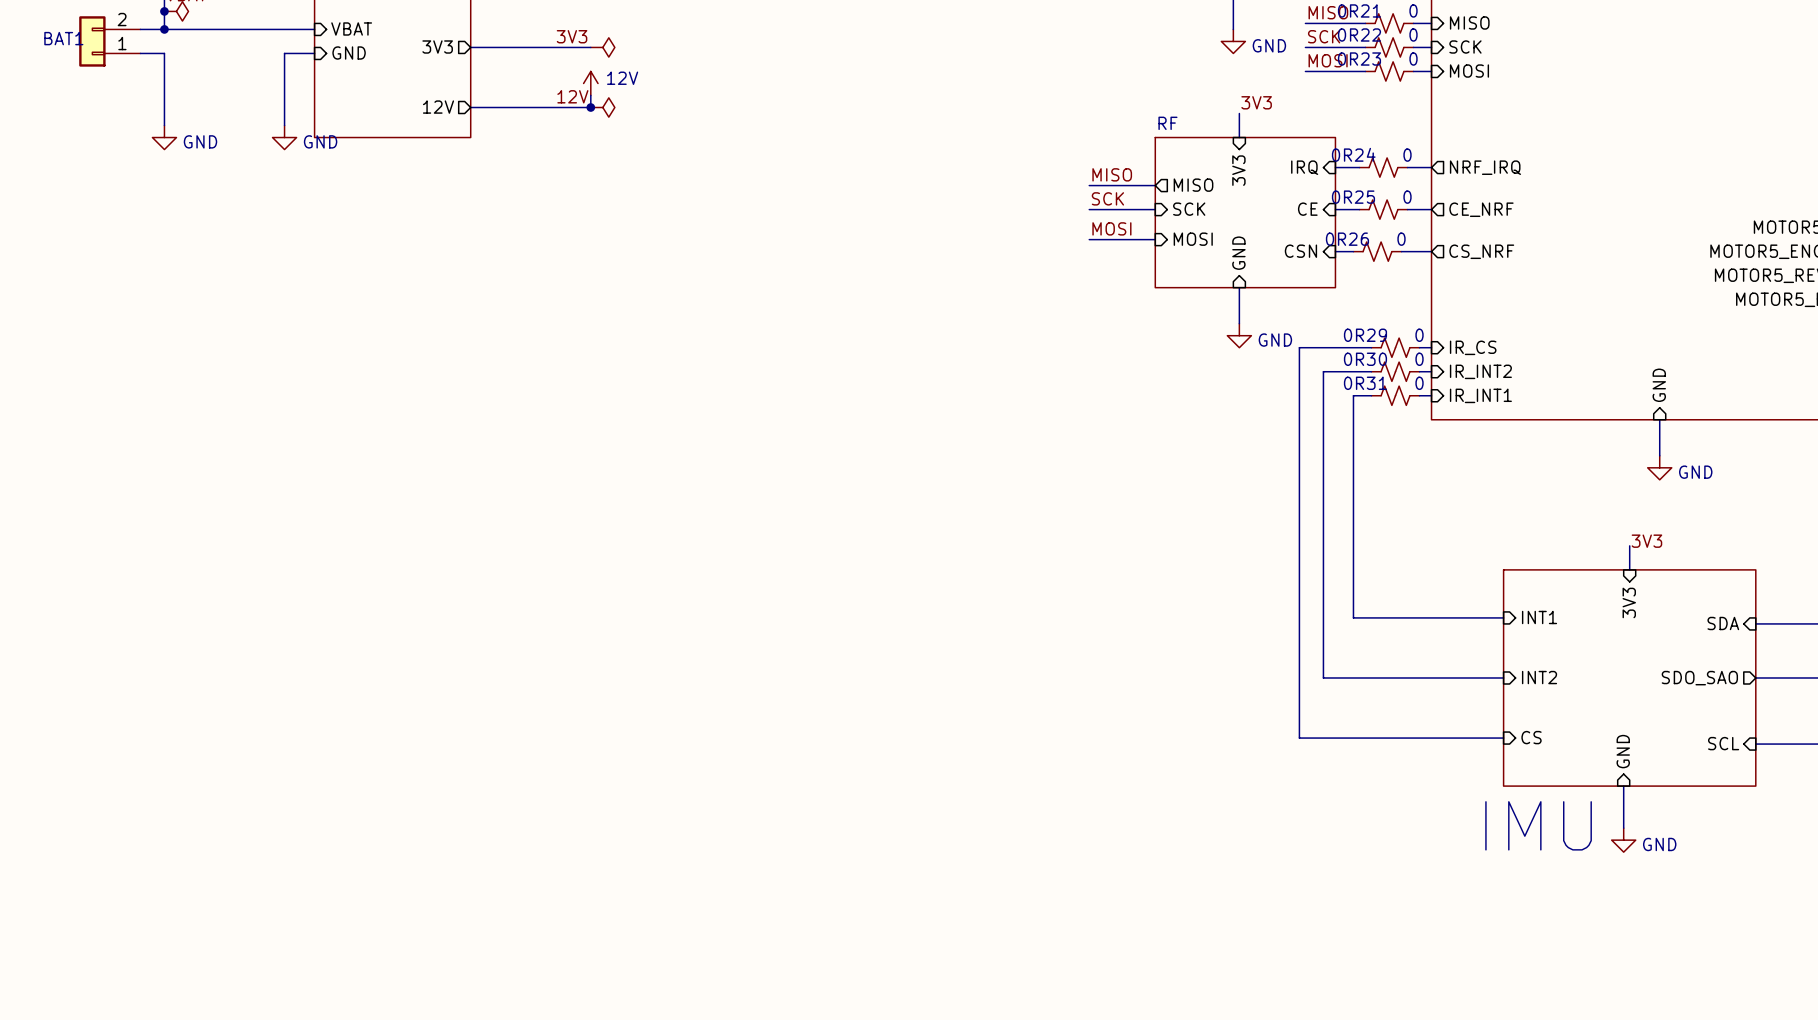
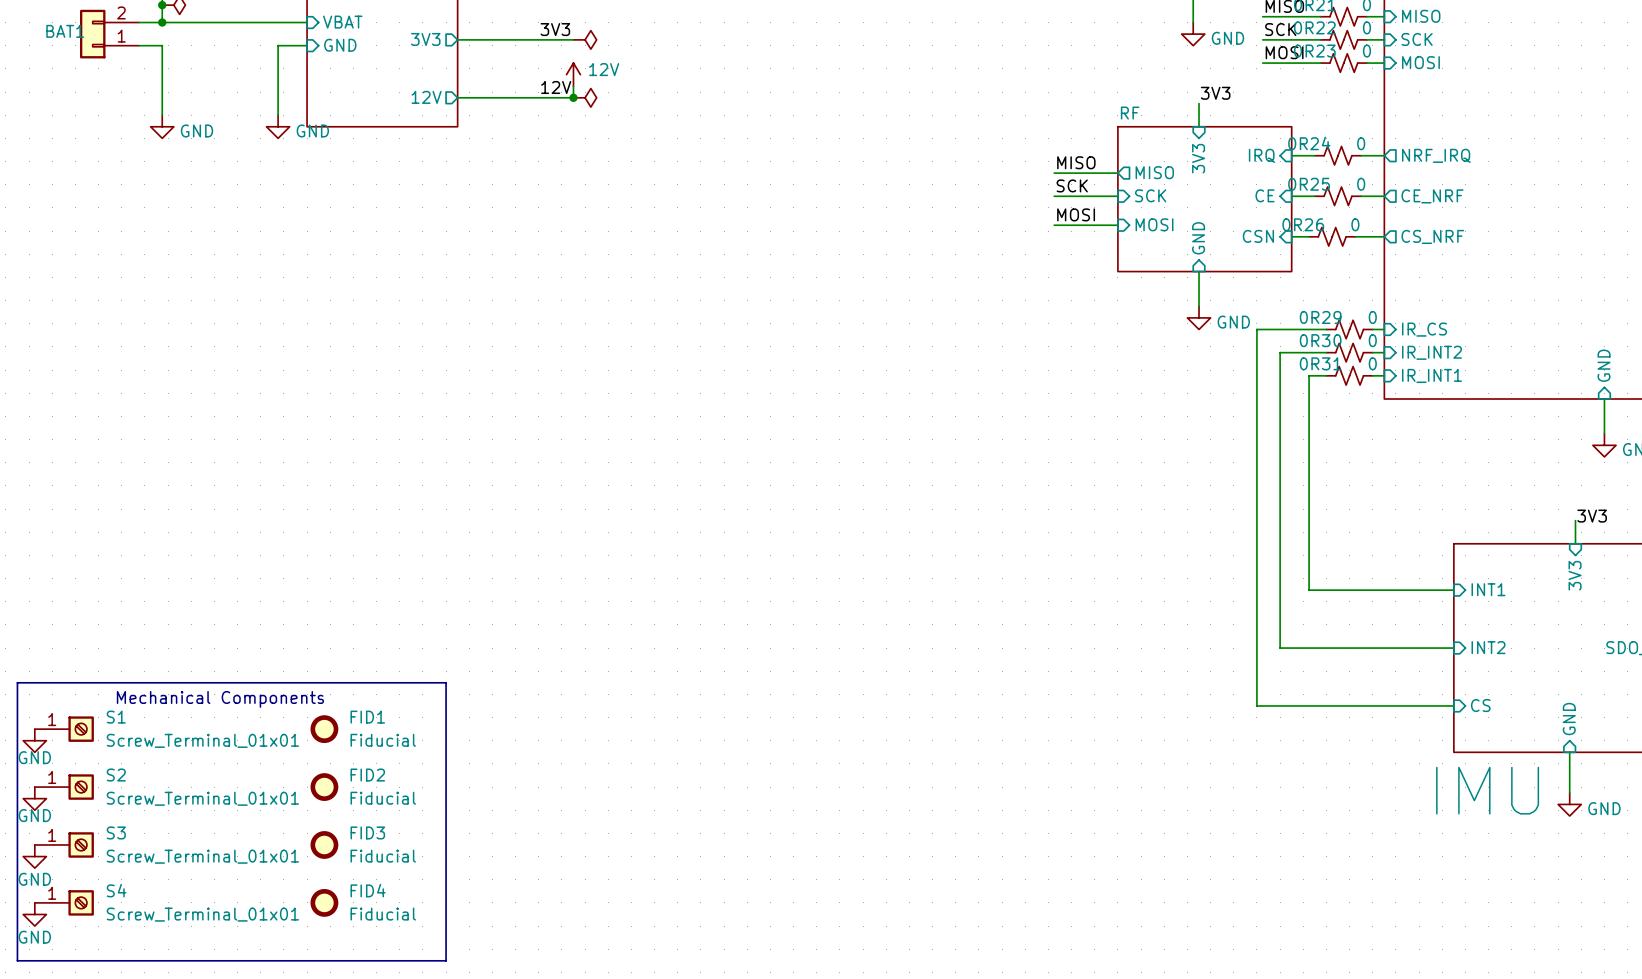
line: none -> (17, 682) (446, 682) (446, 960) (17, 960) (17, 682)
text: none -> Mechanical Components (220, 699)
S1: none -> Screw_Terminal_01x01 (64, 729)
FID1: none -> Fiducial (324, 729)
power symbol: none -> GND (34, 740)
S2: none -> Screw_Terminal_01x01 (64, 787)
FID2: none -> Fiducial (324, 787)
power symbol: none -> GND (34, 798)
S3: none -> Screw_Terminal_01x01 (64, 844)
FID3: none -> Fiducial (324, 844)
power symbol: none -> GND (34, 856)
S4: none -> Screw_Terminal_01x01 (64, 902)
FID4: none -> Fiducial (324, 902)
power symbol: none -> GND (34, 914)

